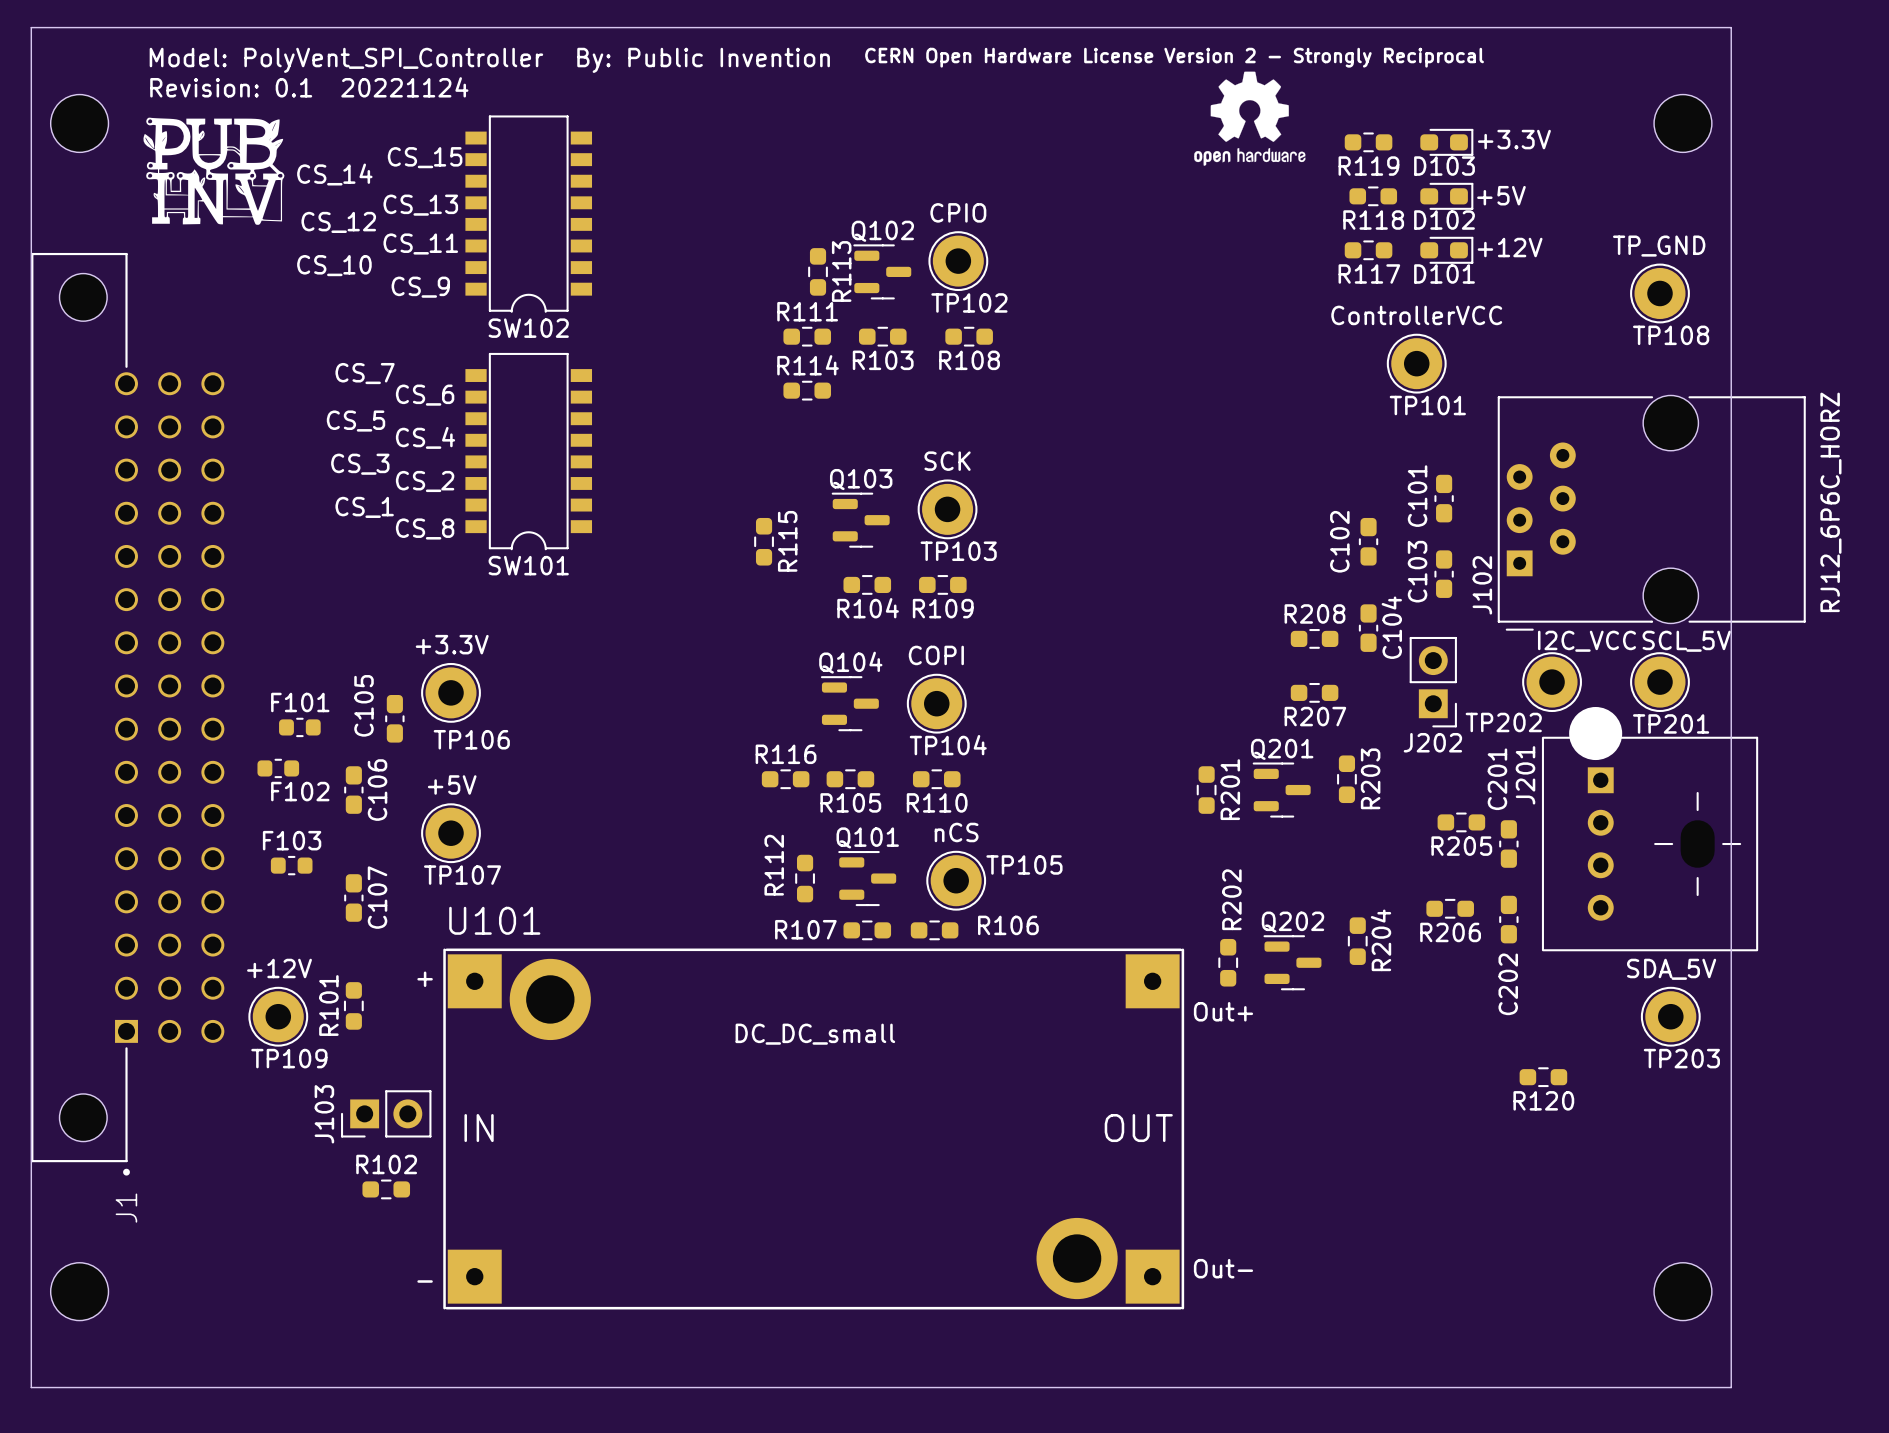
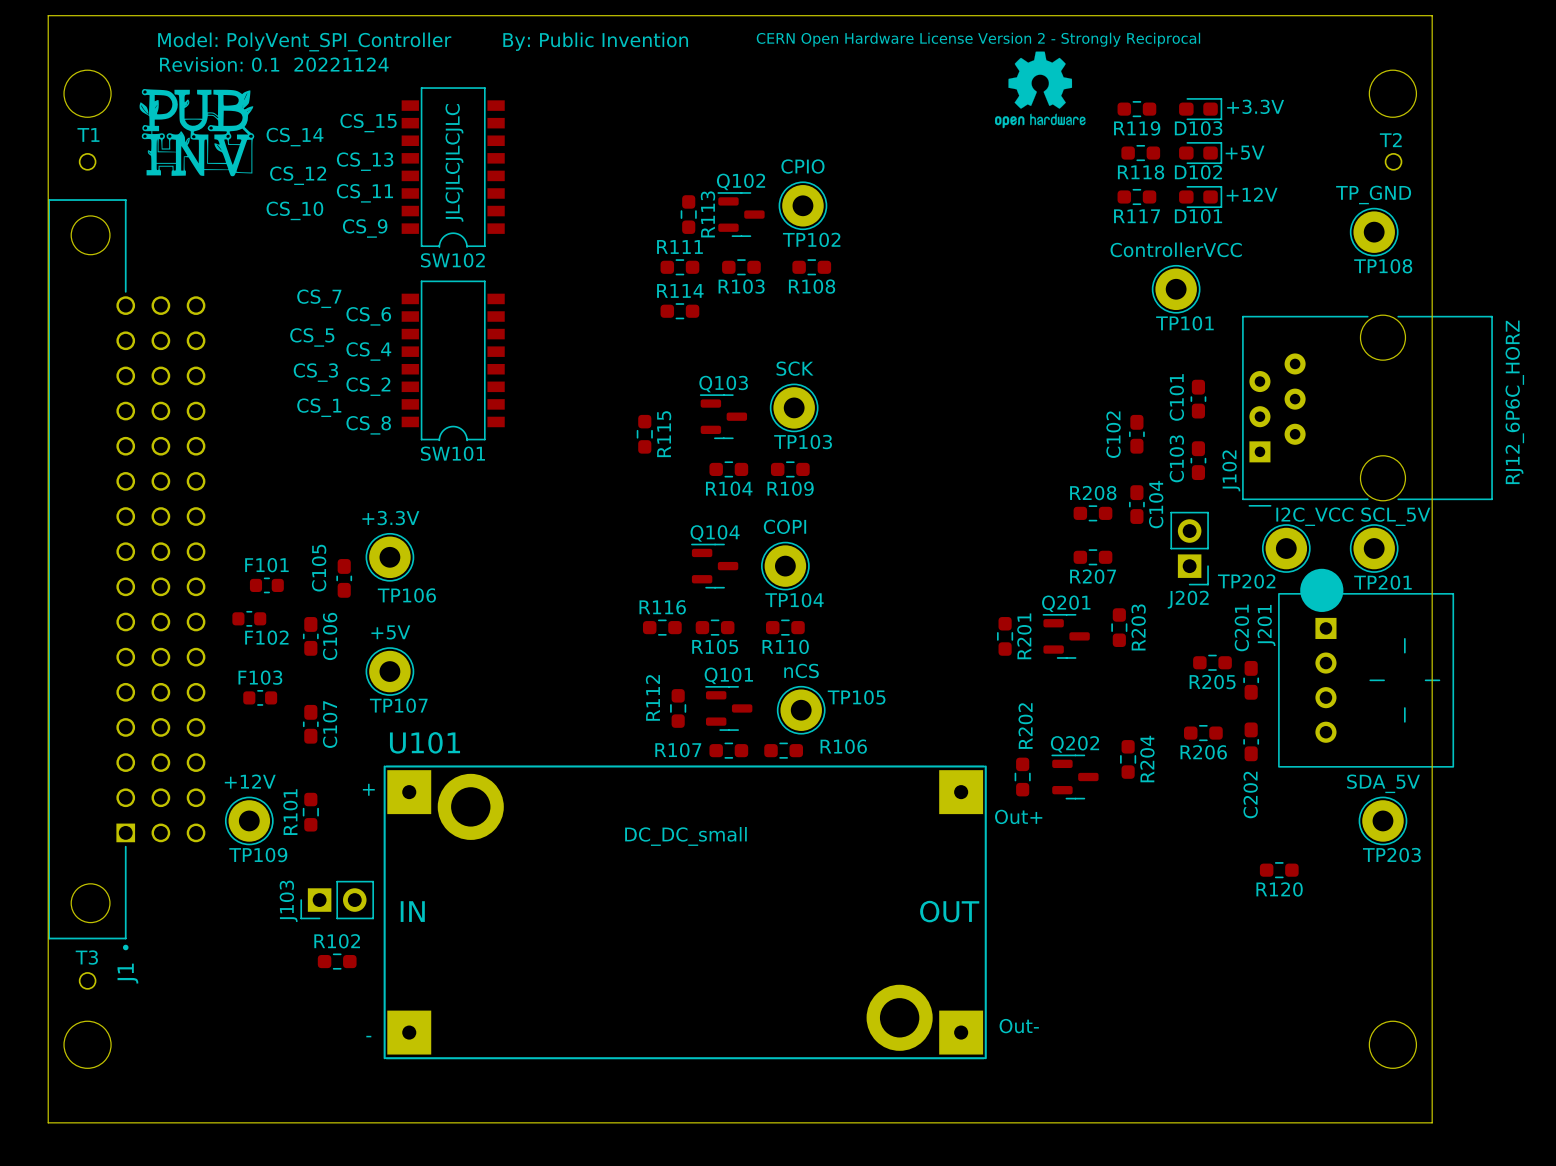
T1: none -> (87, 161)
text: none -> JLCJLCJLCJLC (454, 162)
T2: none -> (1393, 161)
T3: none -> (87, 980)

